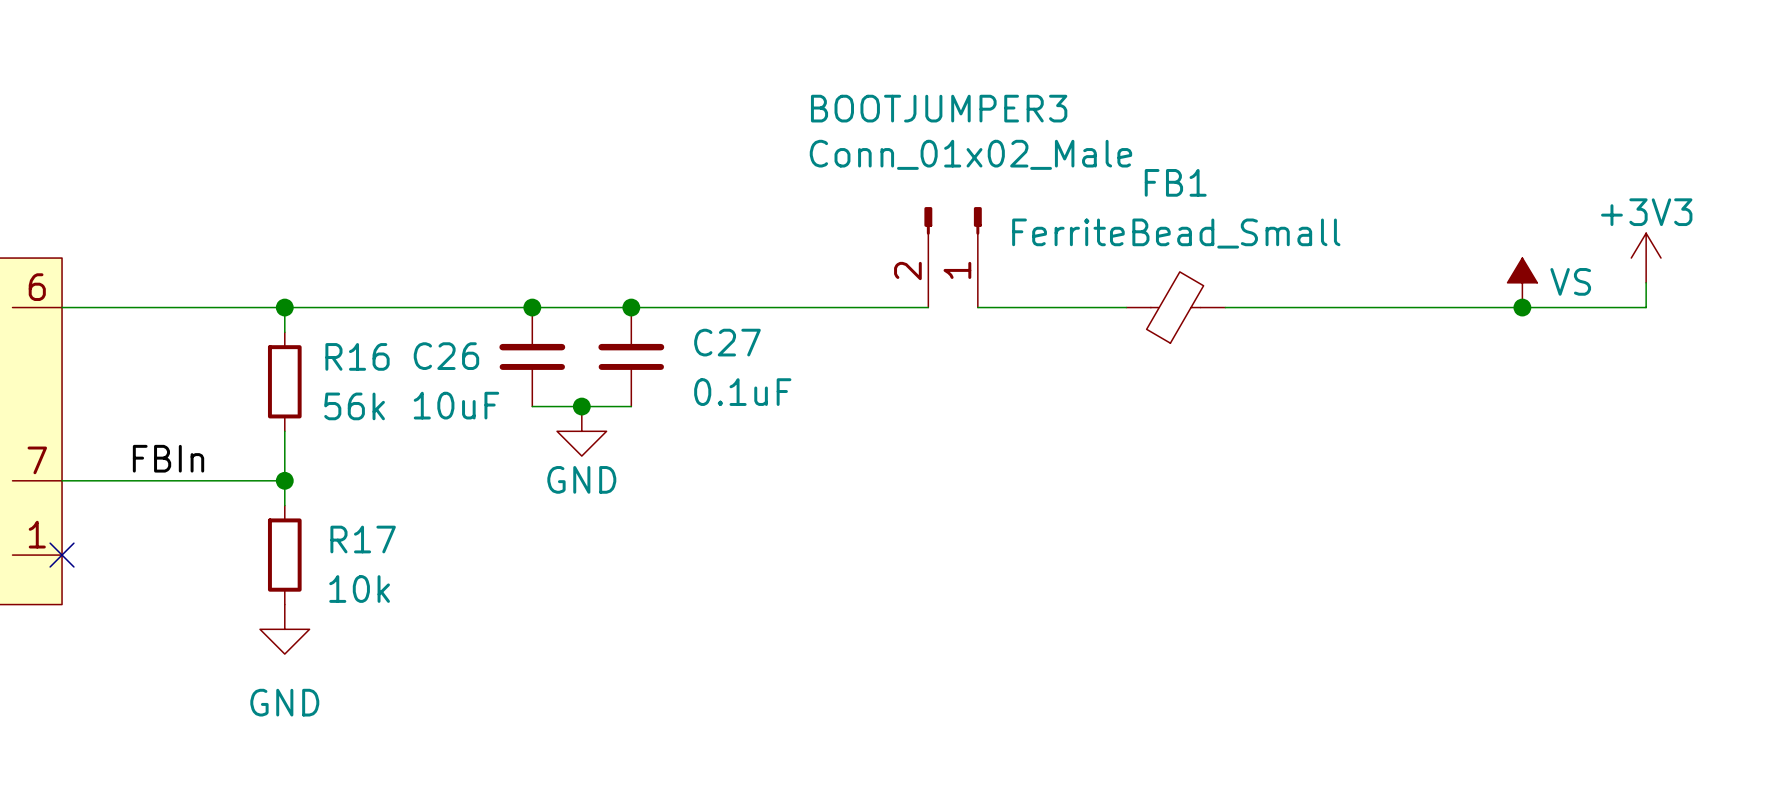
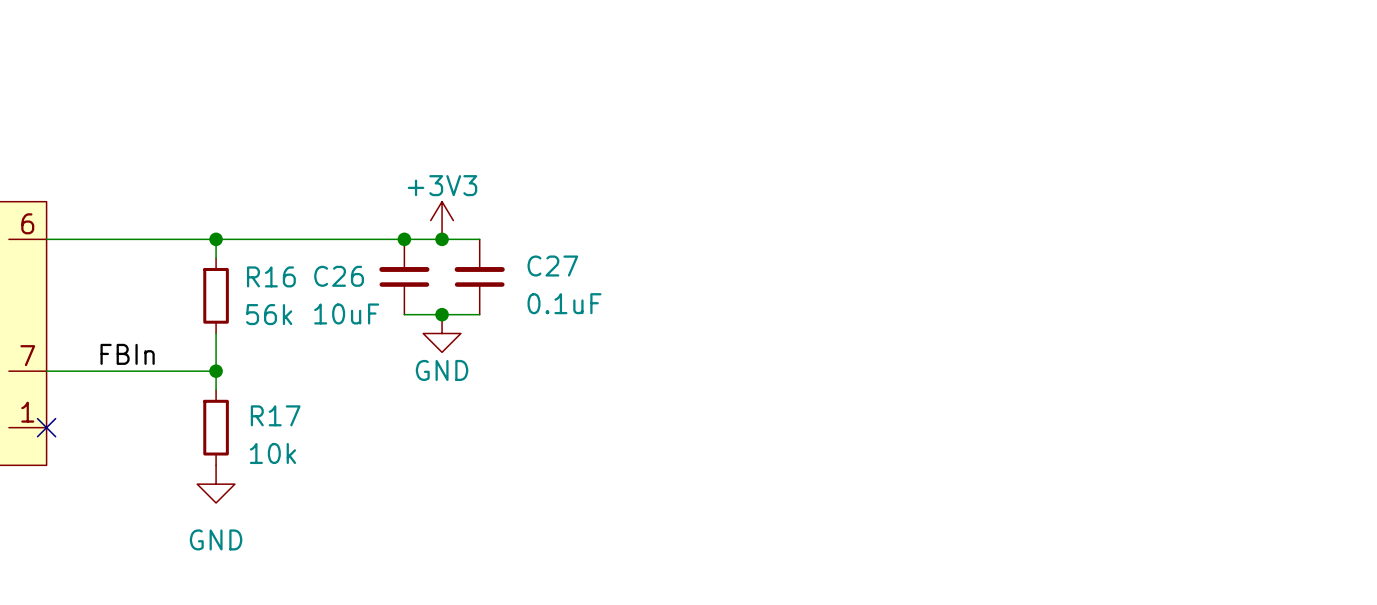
BOOTJUMPER3: Conn_01x02_Male (953, 257) -> none
power symbol: +3V3 (1646, 258) -> none
power symbol: none -> +3V3 (442, 220)
power symbol: VS (1522, 282) -> none
wire: (1646, 282) (1646, 307) (1225, 307) -> none
wire: (631, 307) (928, 307) -> none
junction position: (631, 307) -> (442, 239)
wire: (977, 307) (1126, 307) -> none
FB1: FerriteBead_Small (1175, 307) -> none
junction: (1522, 307) -> none

